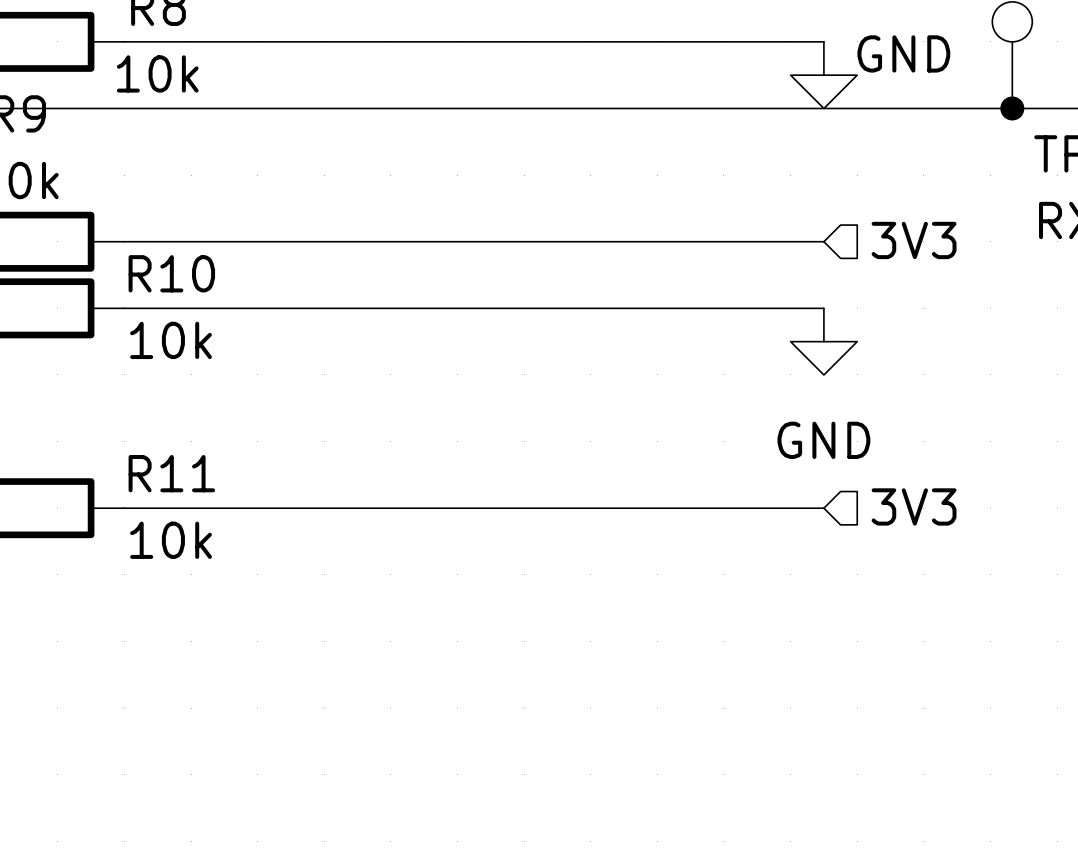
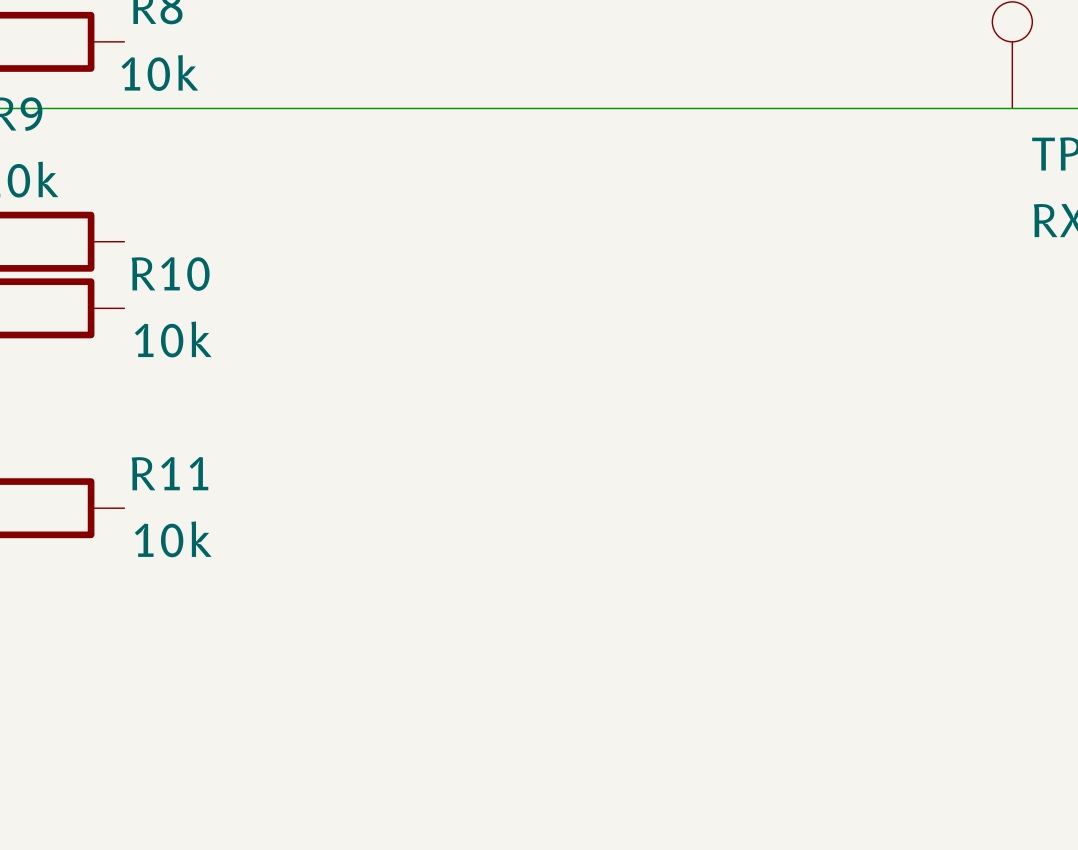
wire: (124, 41) (823, 41) -> none
power symbol: GND (823, 75) -> none
junction: (1012, 108) -> none
hierarchical label: 3V3 (914, 240) -> none
wire: (124, 241) (823, 241) -> none
wire: (124, 308) (823, 308) -> none
power symbol: GND (823, 341) -> none
hierarchical label: 3V3 (914, 506) -> none
wire: (124, 508) (823, 508) -> none

